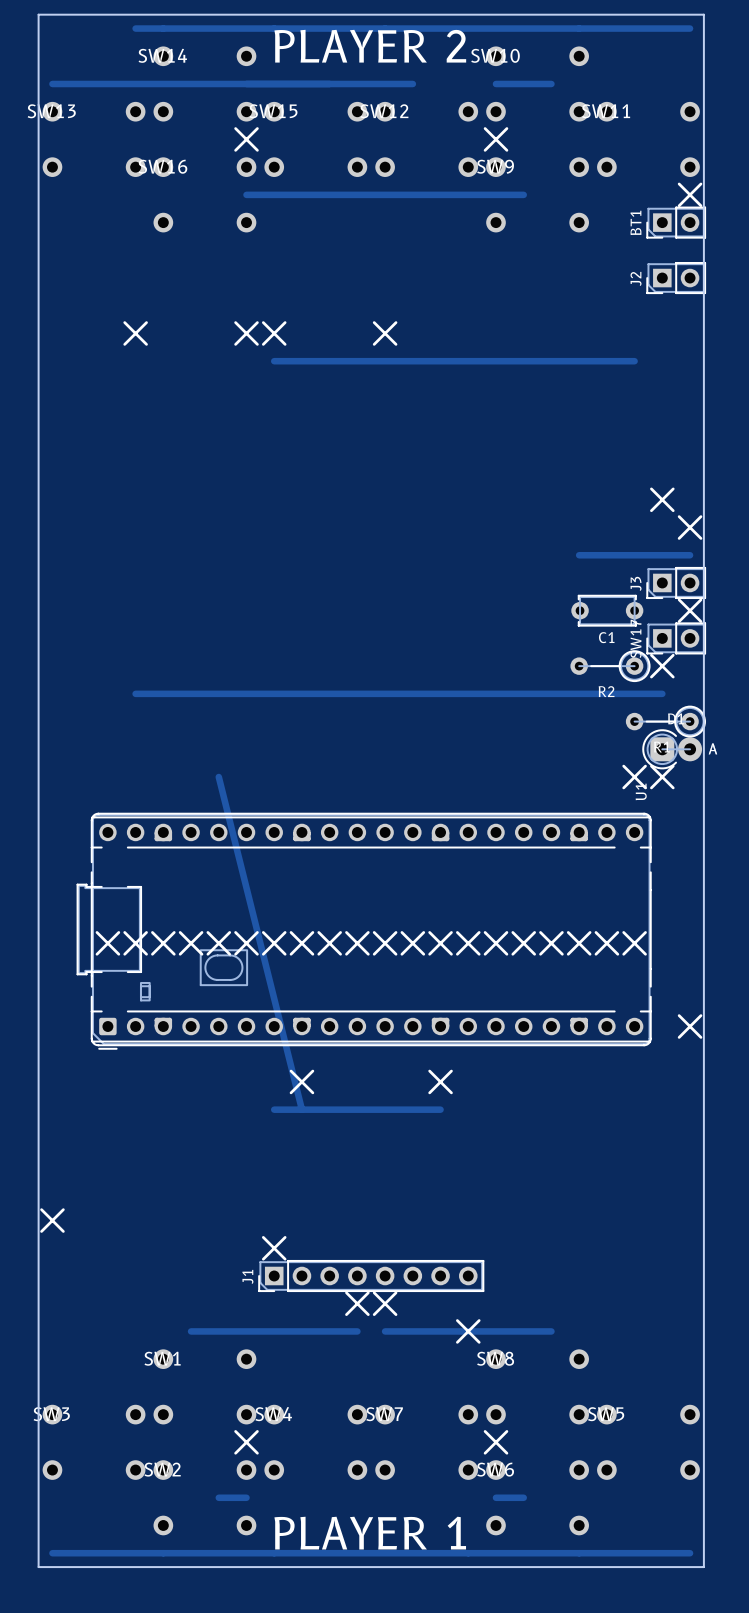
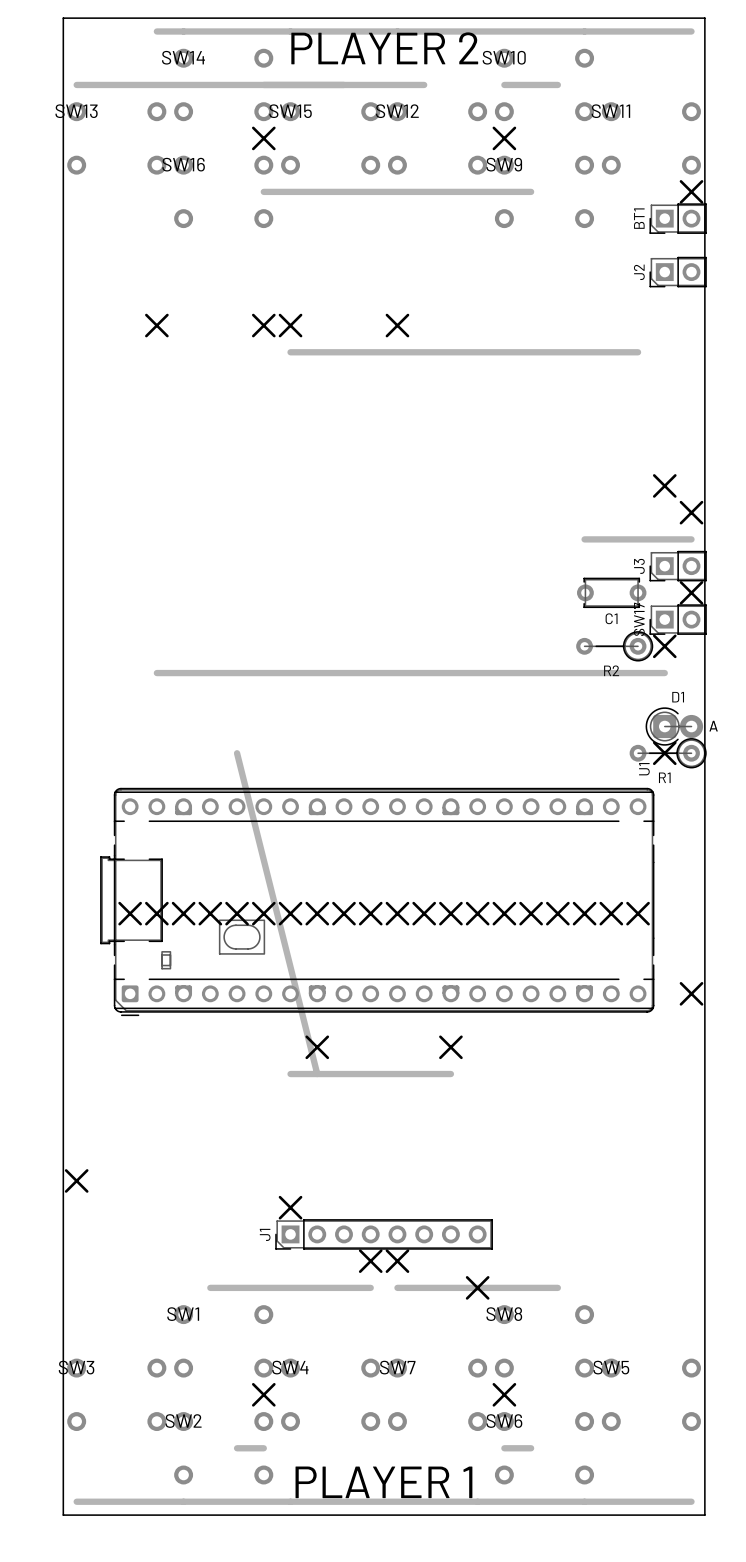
R1 position: (665, 721) -> (668, 753)
line: (623, 766) (645, 787) -> none
line: (645, 766) (623, 787) -> none

